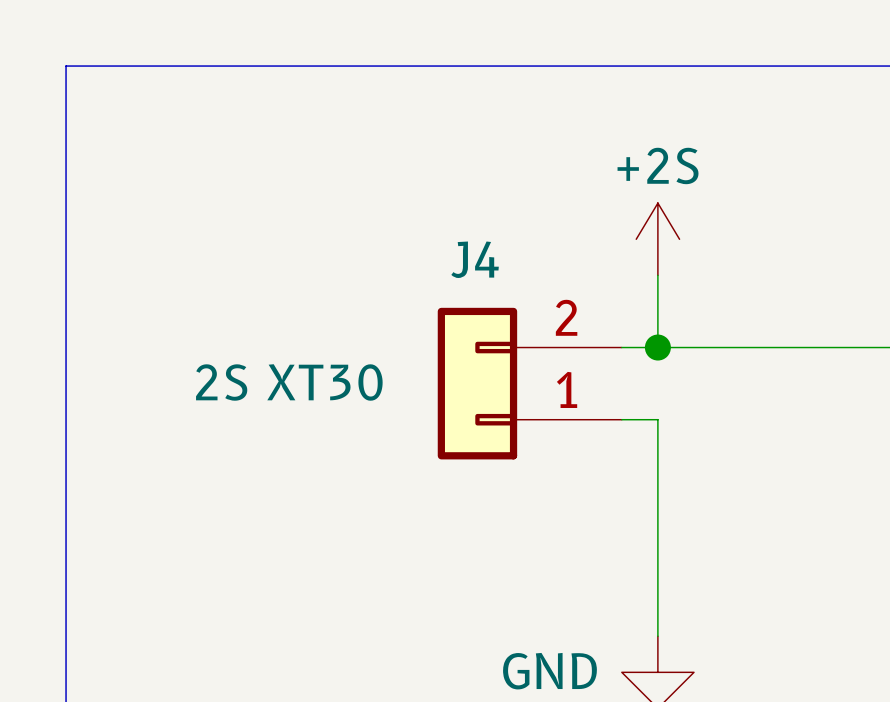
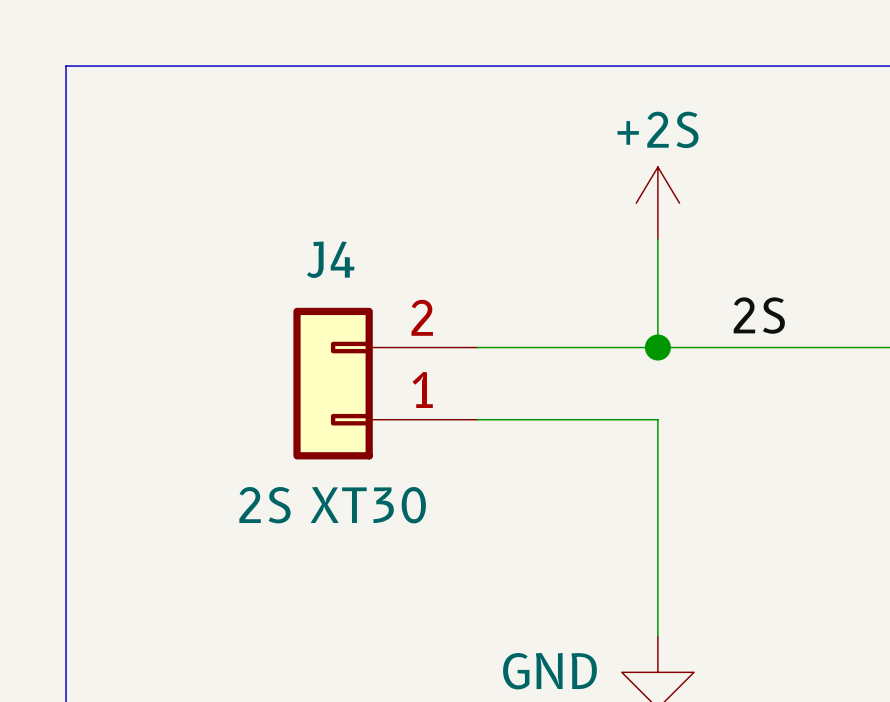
power symbol position: +2S (657, 239) -> +2S (657, 203)
label: none -> 2S (759, 315)
J4 value position: 2S XT30 (289, 382) -> 2S XT30 (332, 505)
J4 position: (529, 383) -> (385, 383)

